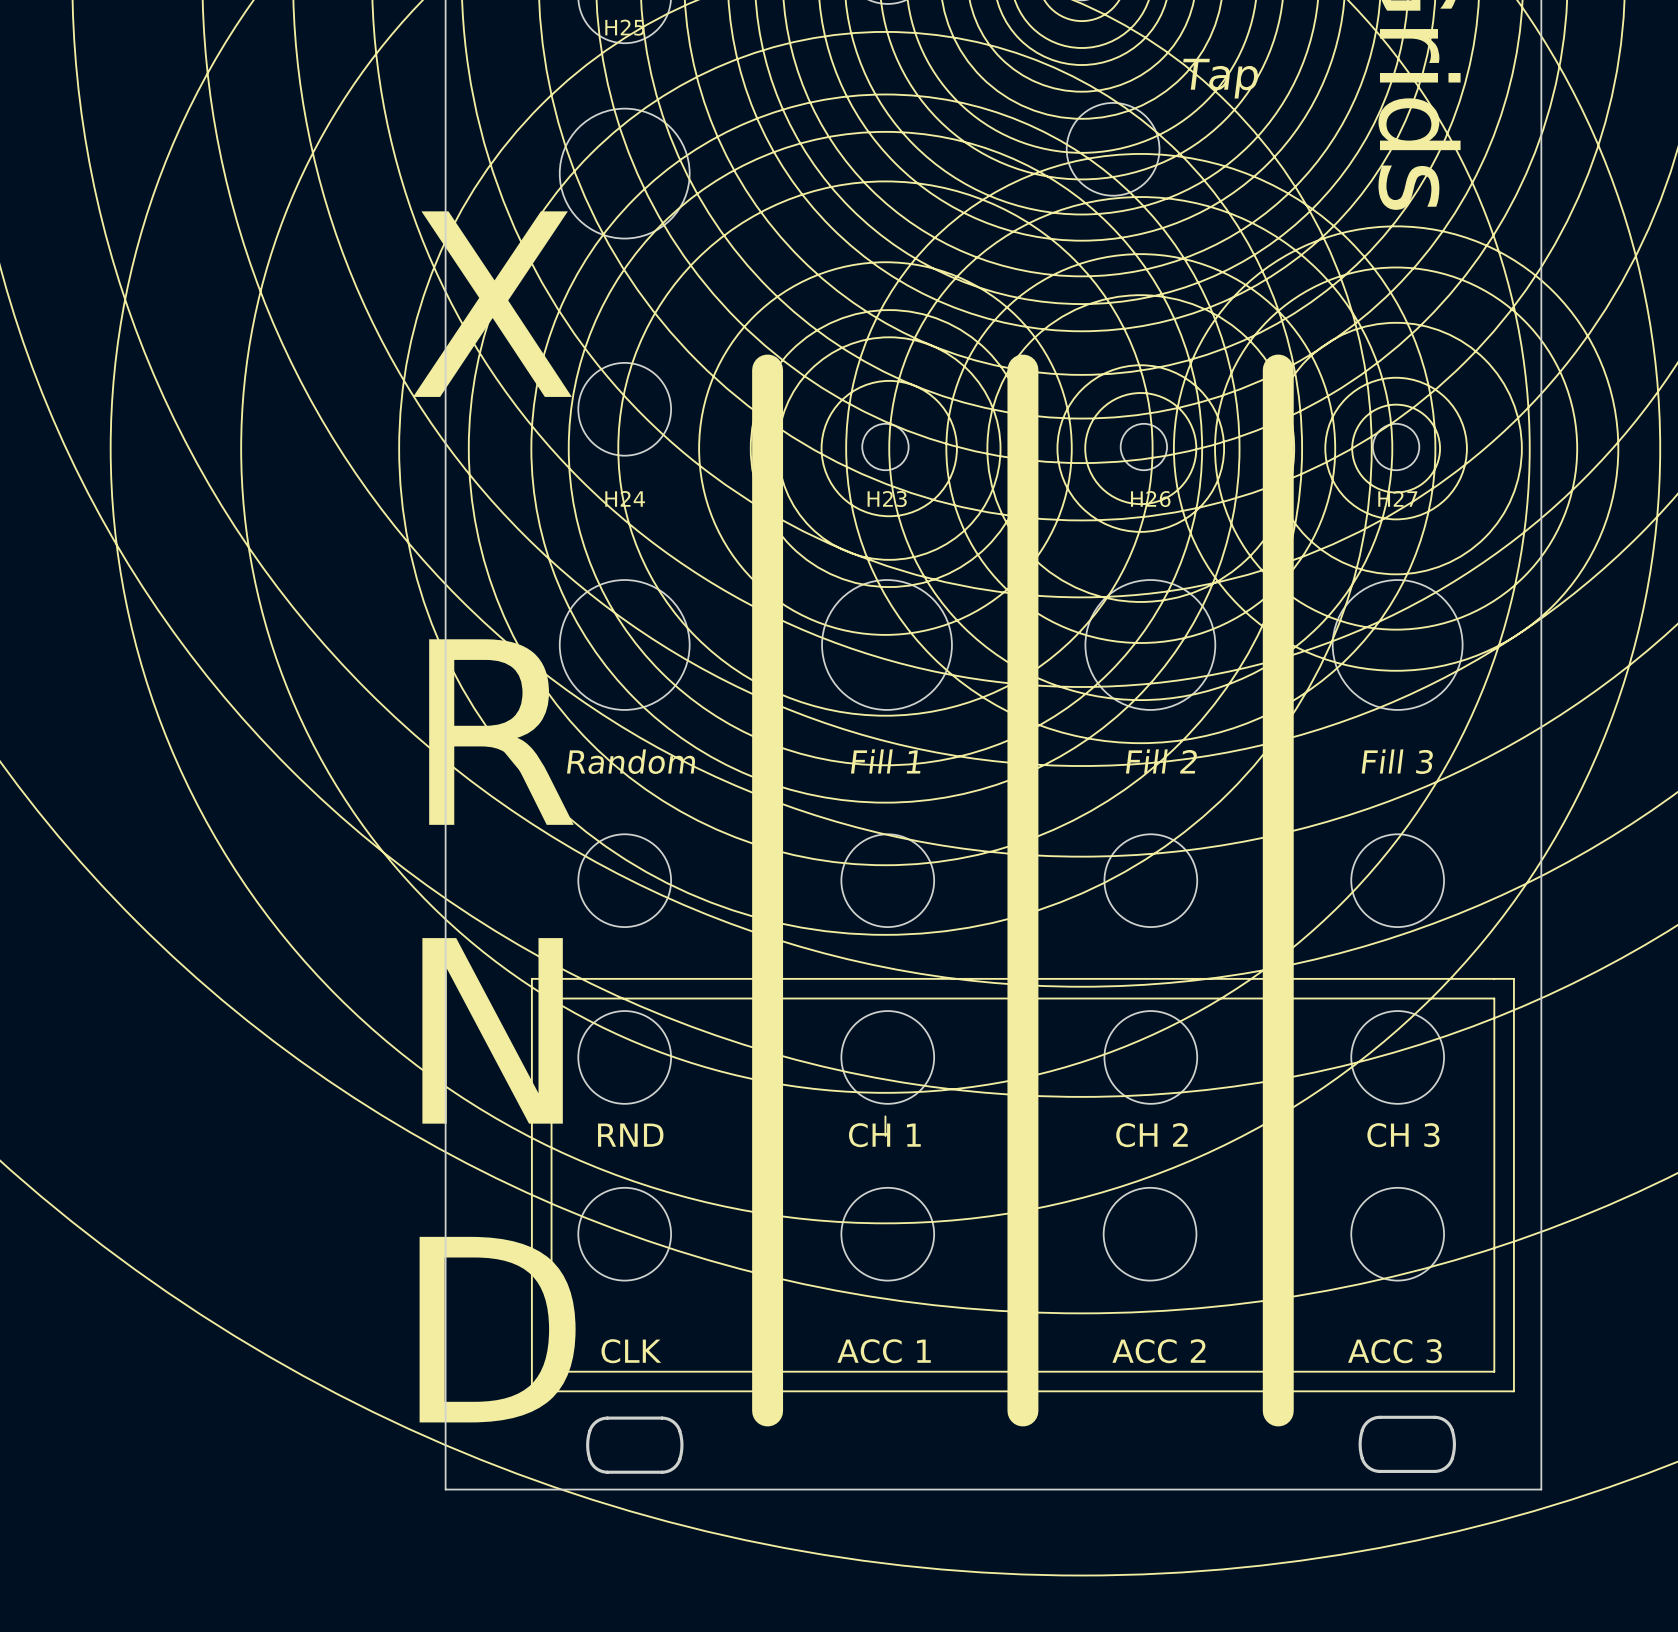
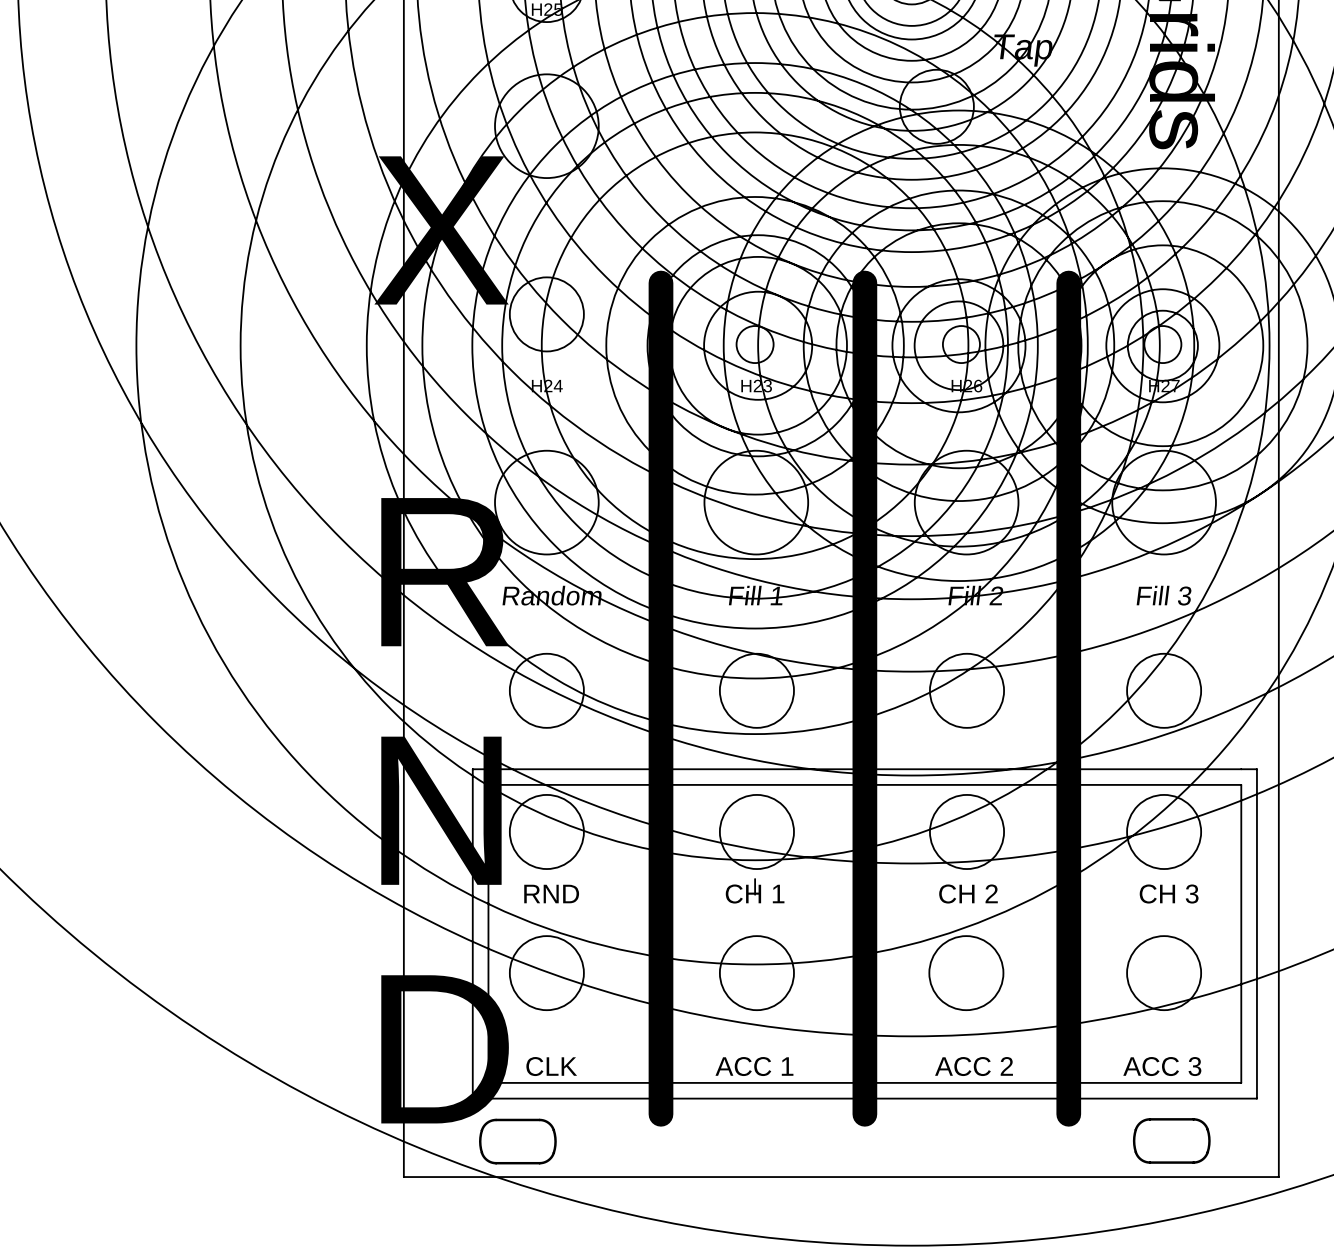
board edge: (607, 1418) (600, 1419) (593, 1424) (589, 1431) (587, 1445) (589, 1459) (593, 1465) (598, 1469) (607, 1472) -> (533, 1119) (490, 1121) (482, 1128) (480, 1141) (482, 1154) (490, 1162) (533, 1163)
board edge: (615, 1418) (669, 1419) (678, 1428) (681, 1445) (678, 1461) (669, 1470) (615, 1472) -> (539, 1119) (551, 1125) (555, 1141) (551, 1157) (539, 1163)

